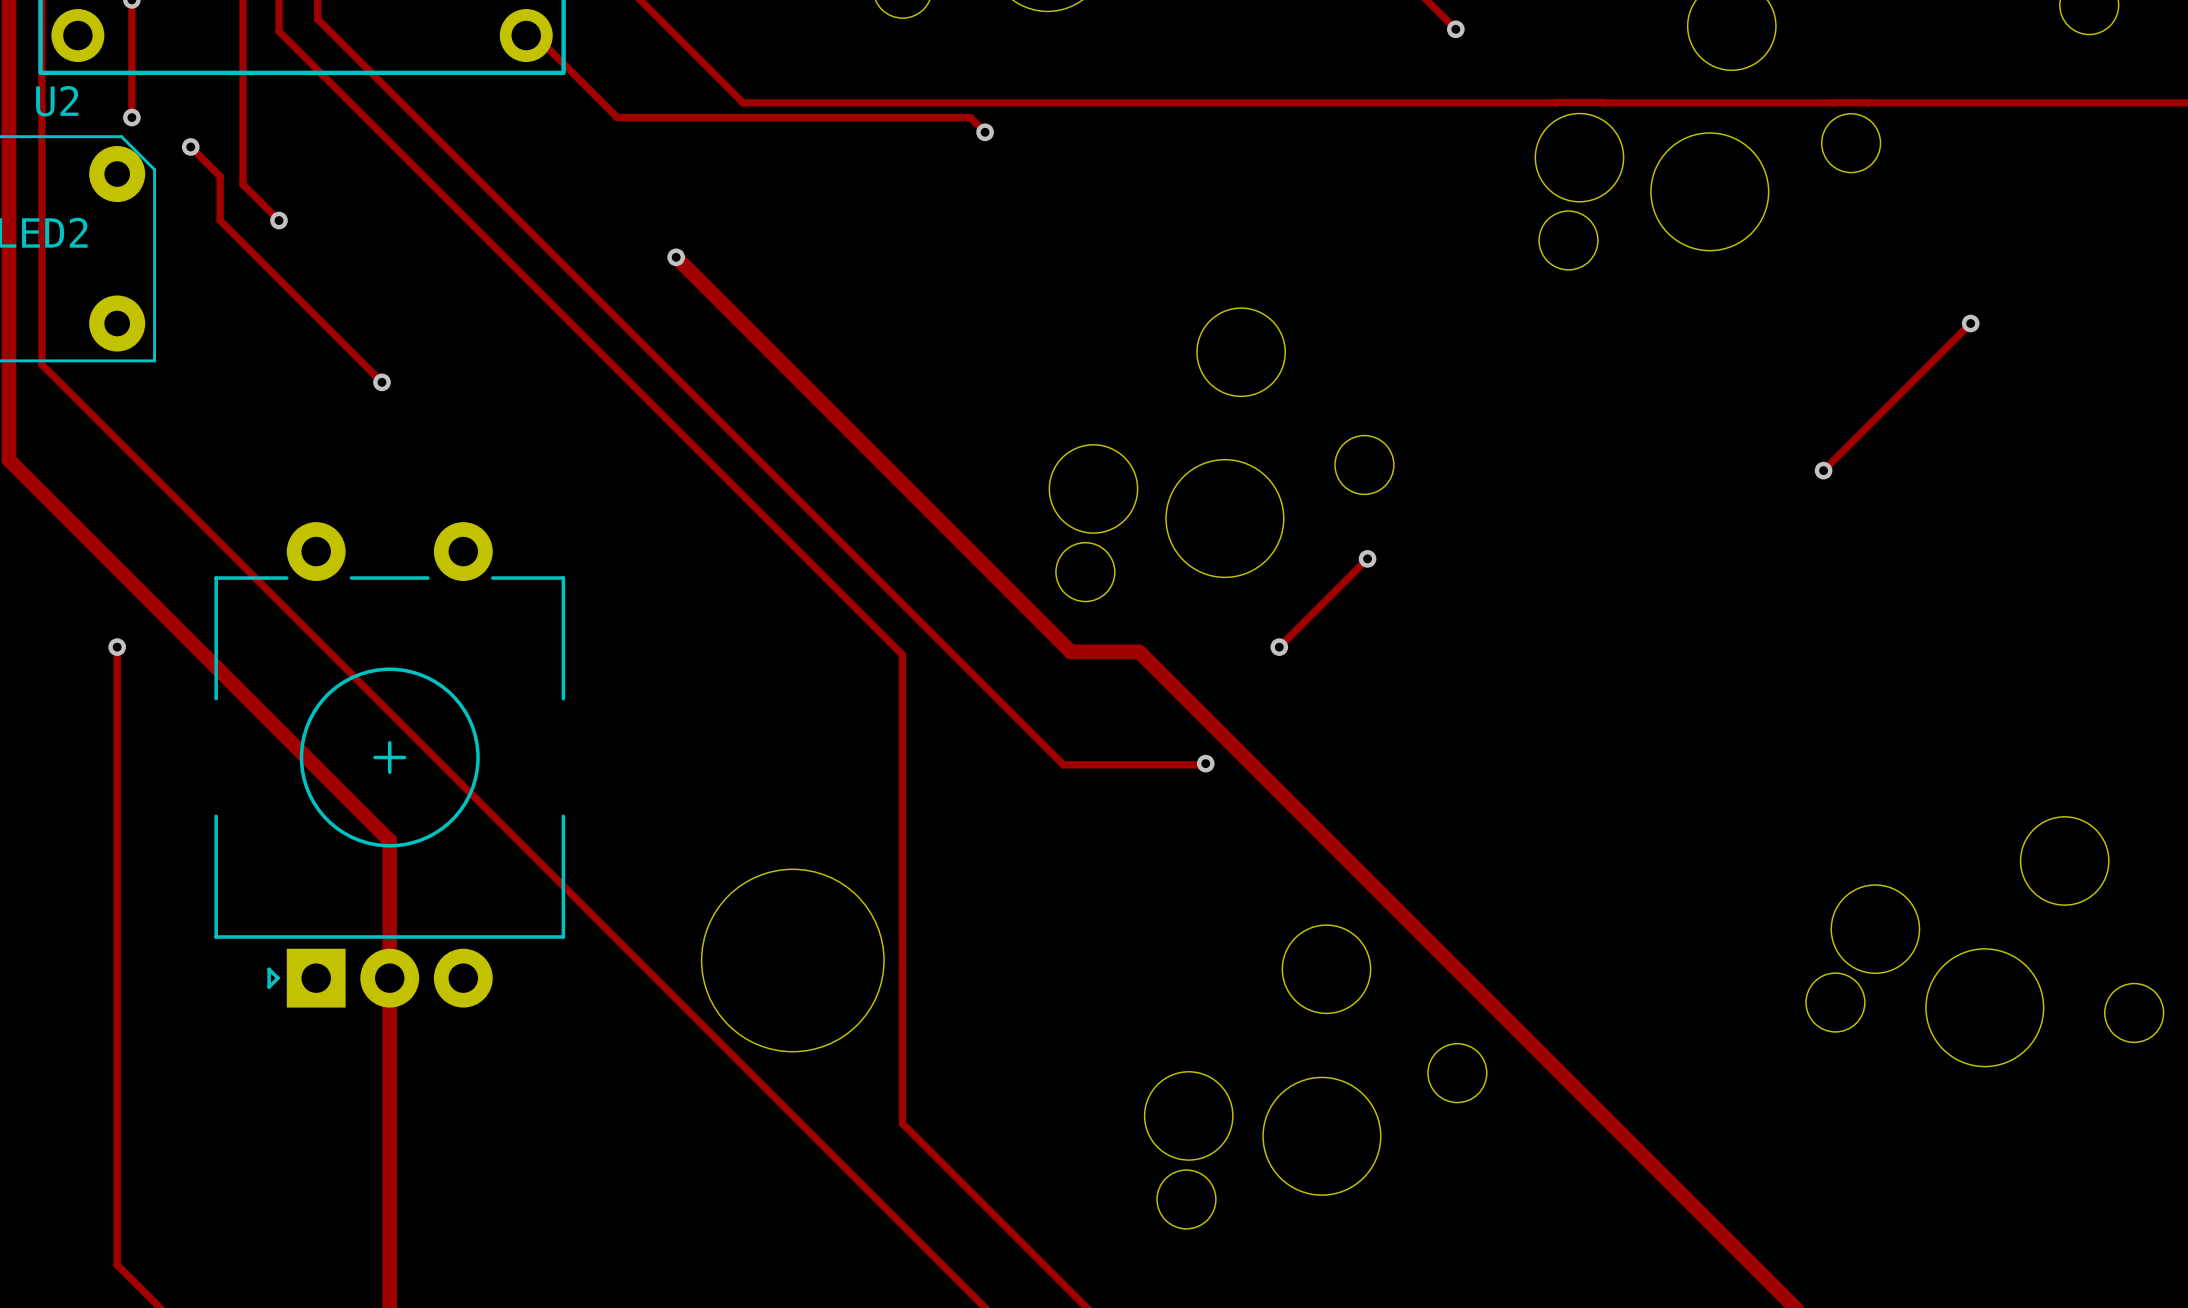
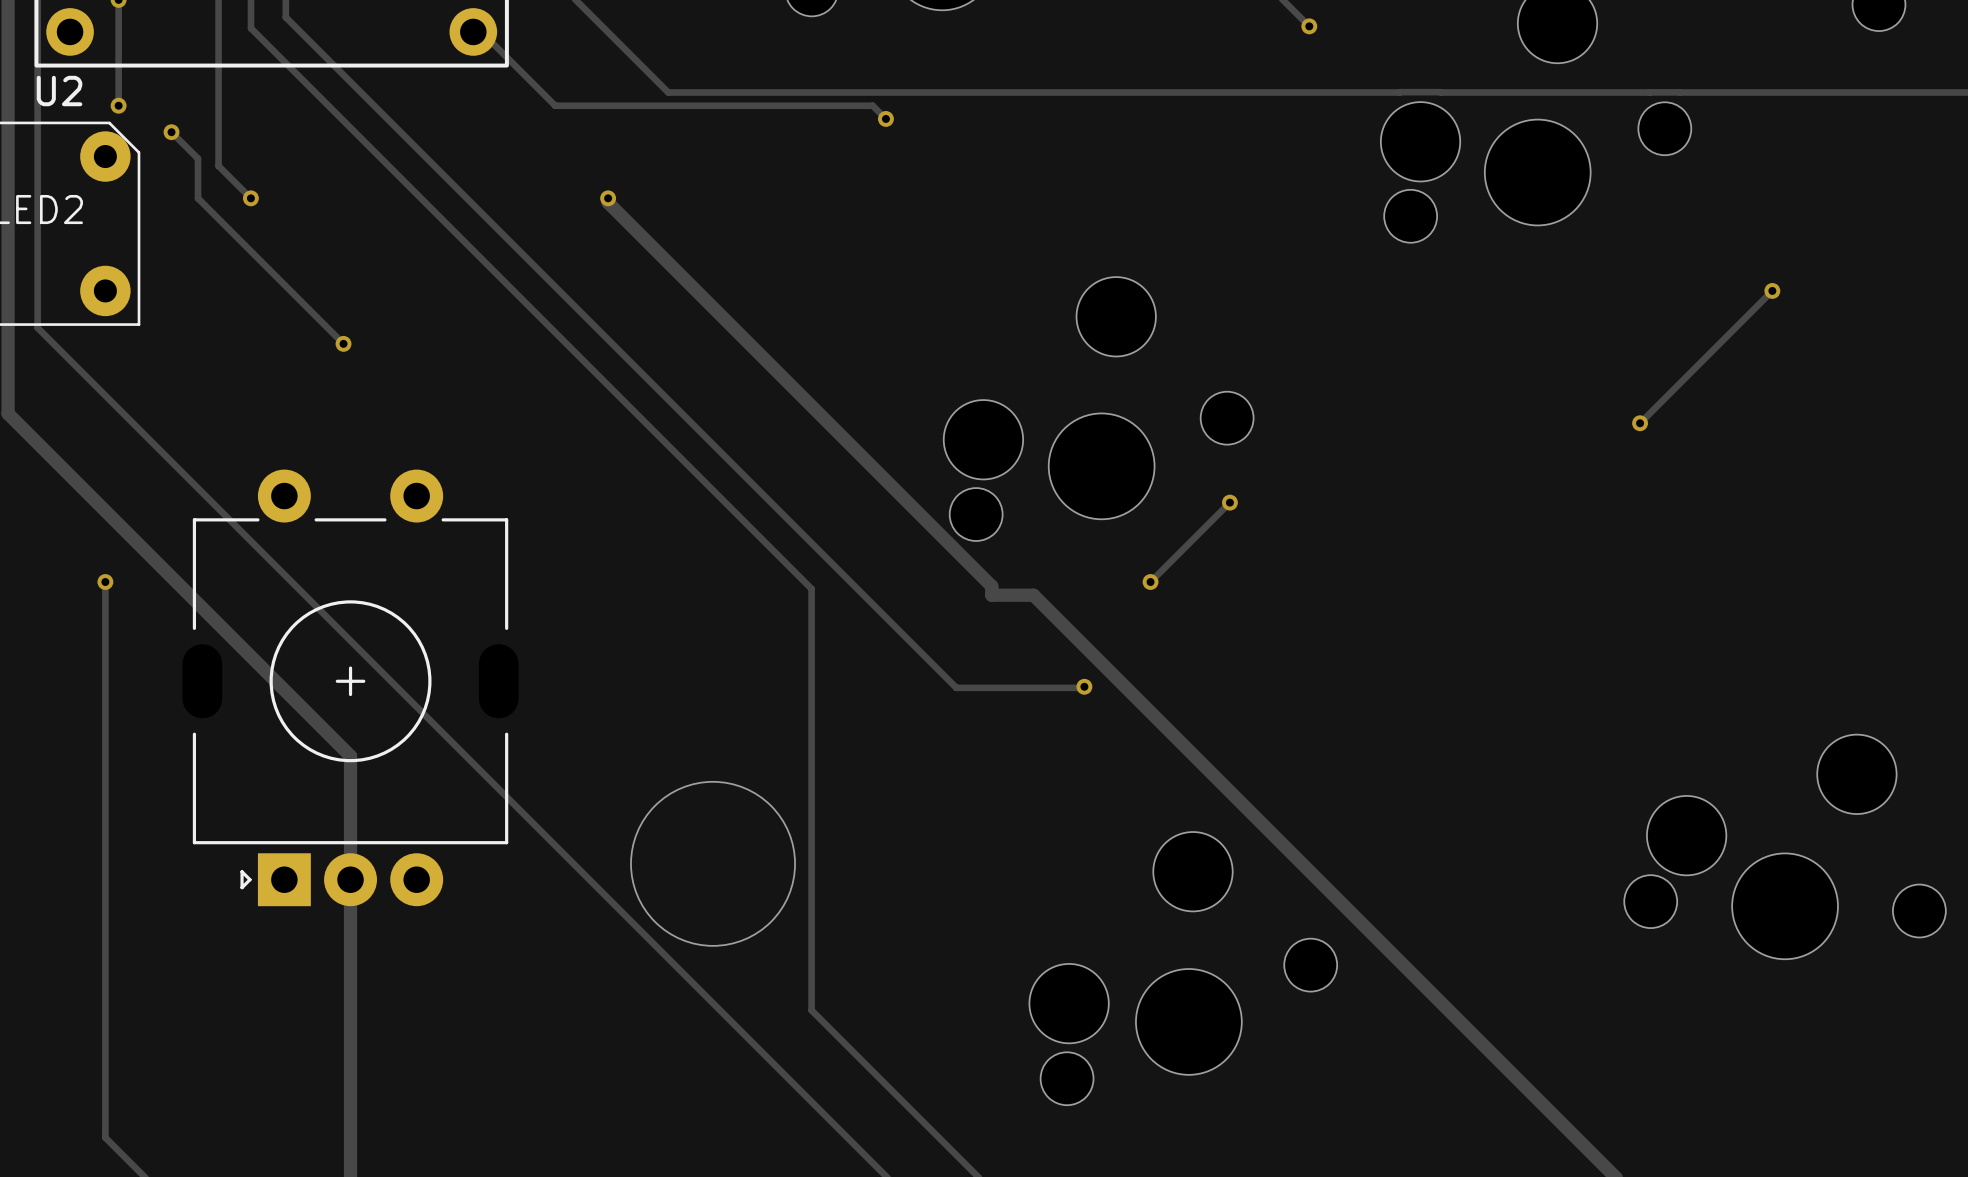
track: (676, 257) (1070, 651) (1139, 651) (1149, 661) -> (608, 198) (608, 202) (991, 586) (991, 595) (1033, 595)
via position: (676, 257) -> (608, 198)

